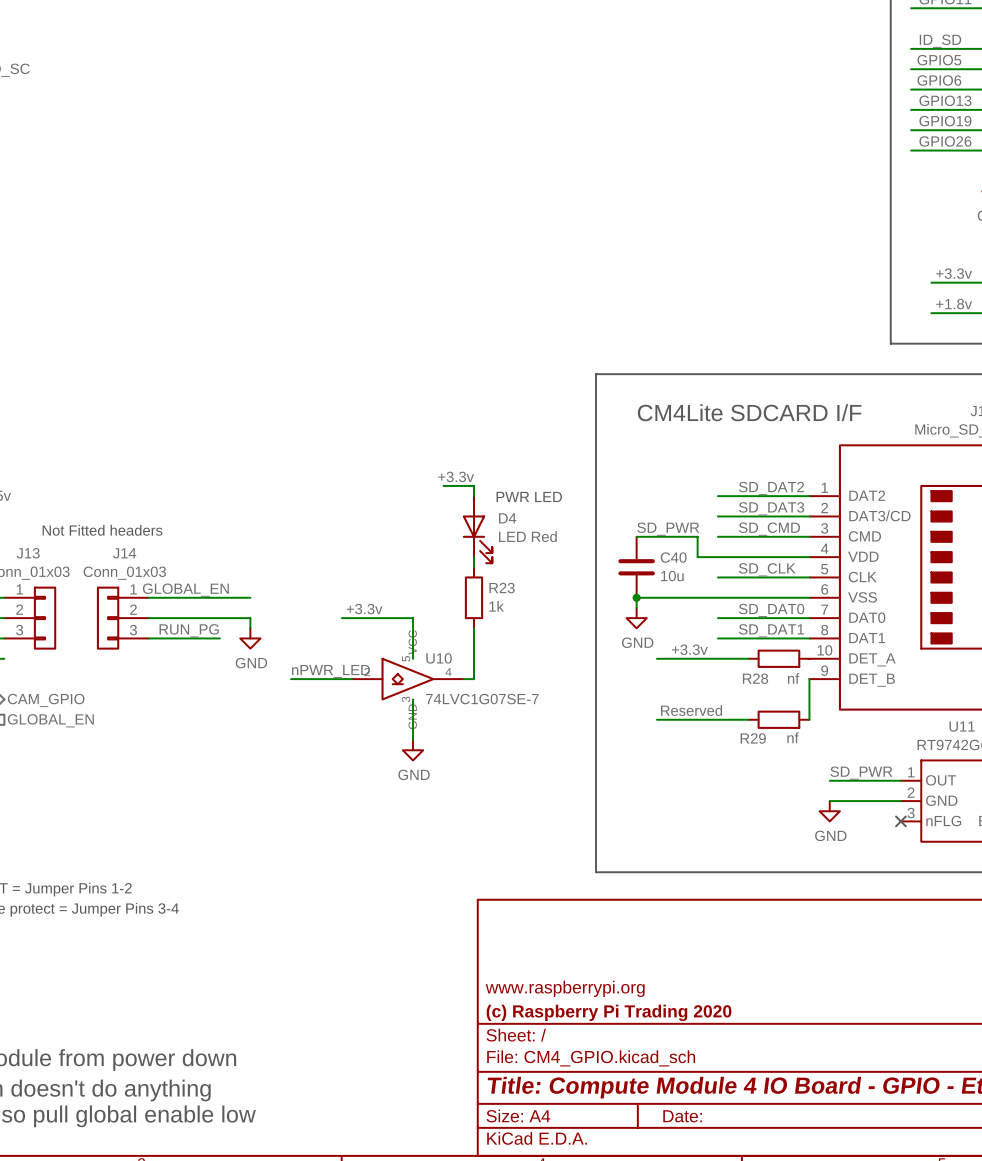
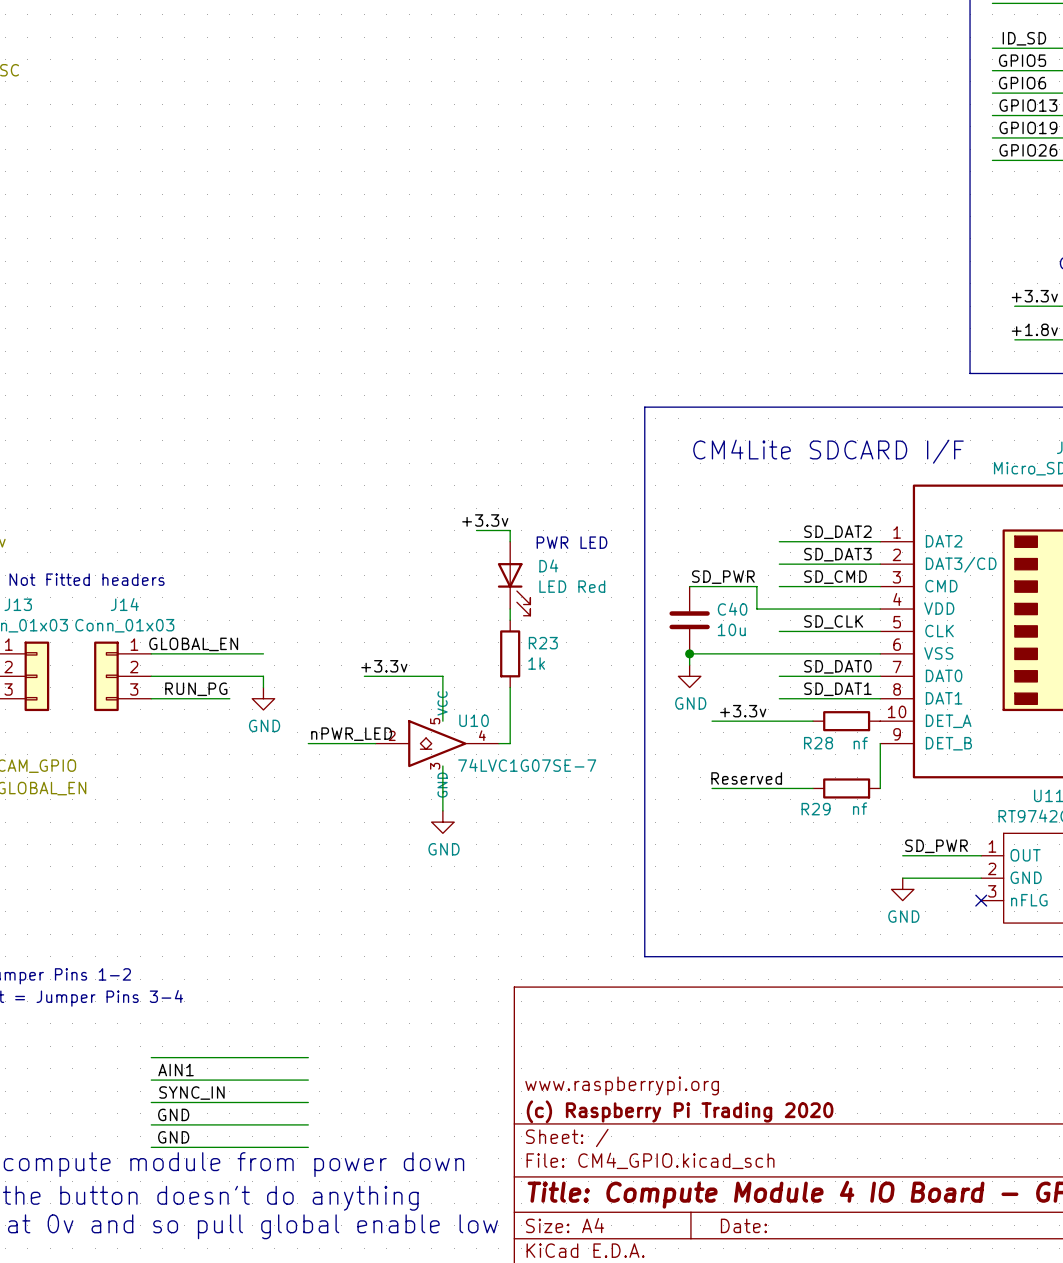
wire: none -> (151, 1057) (308, 1057)
label: none -> AIN1 (176, 1070)
wire: none -> (151, 1080) (308, 1080)
label: none -> SYNC_IN (191, 1093)
wire: none -> (151, 1102) (308, 1102)
label: none -> GND (173, 1114)
wire: none -> (151, 1124) (308, 1124)
label: none -> GND (173, 1137)
wire: none -> (151, 1147) (308, 1147)

